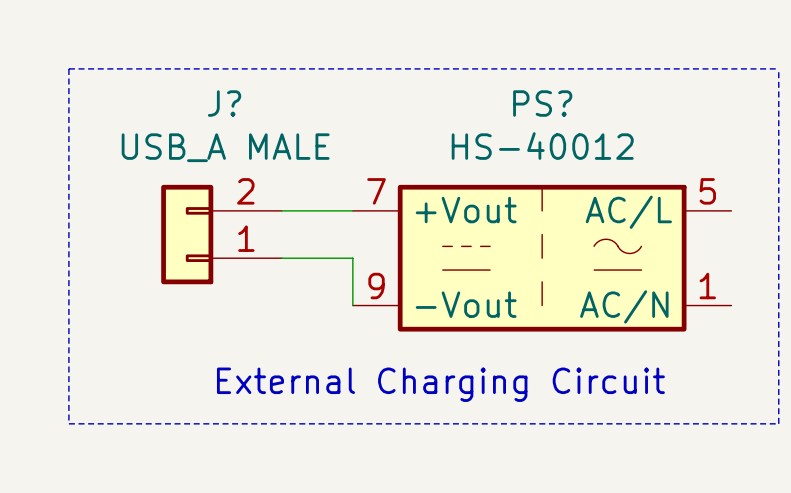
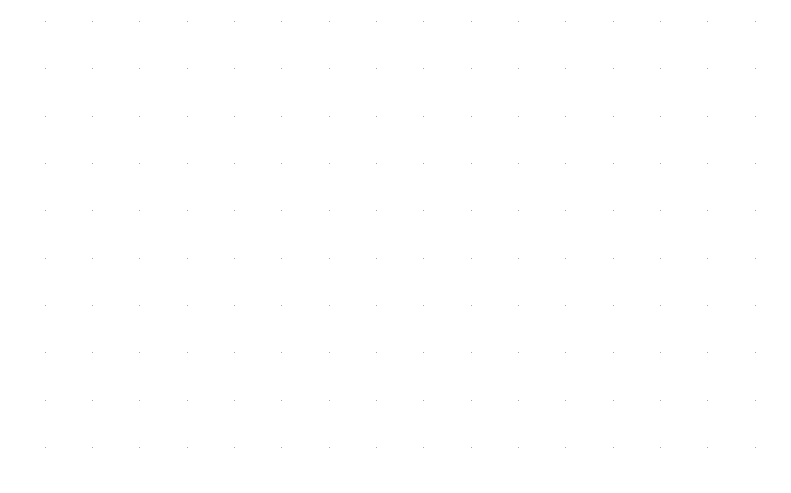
line: (68, 68) (778, 68) (778, 423) (68, 423) (68, 68) -> none
wire: (281, 210) (352, 210) -> none
J?: USB_A MALE (221, 234) -> none
wire: (281, 258) (352, 258) (352, 305) -> none
PS?: HS-40012 (542, 258) -> none
text: External Charging Circuit (440, 384) -> none

